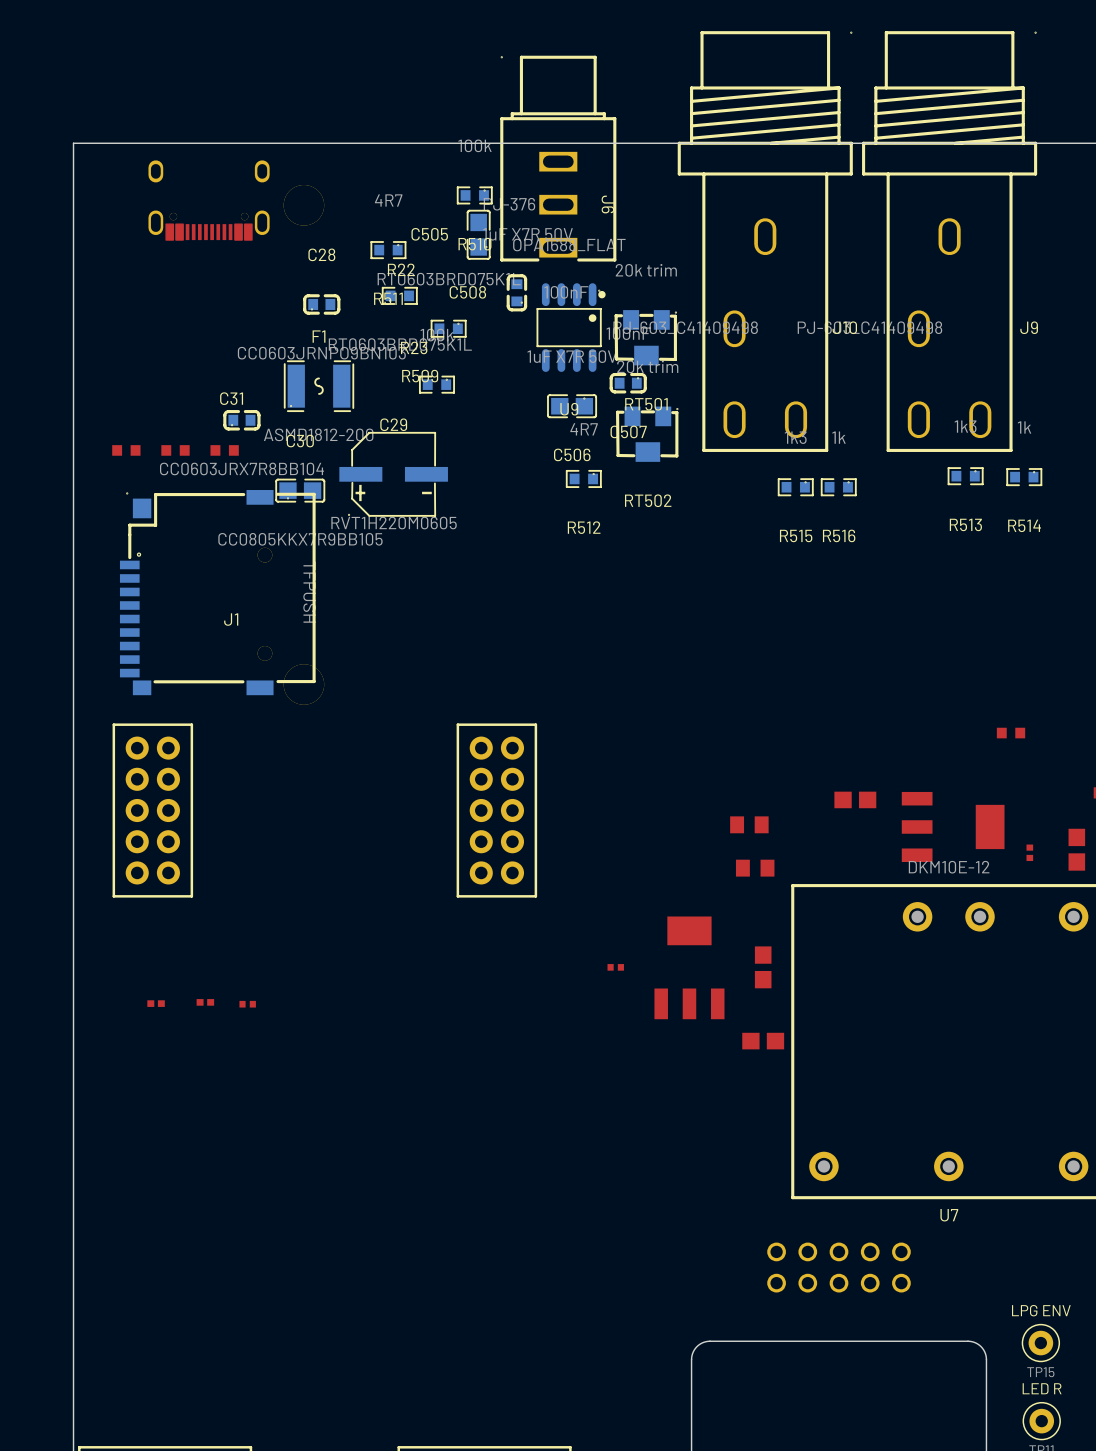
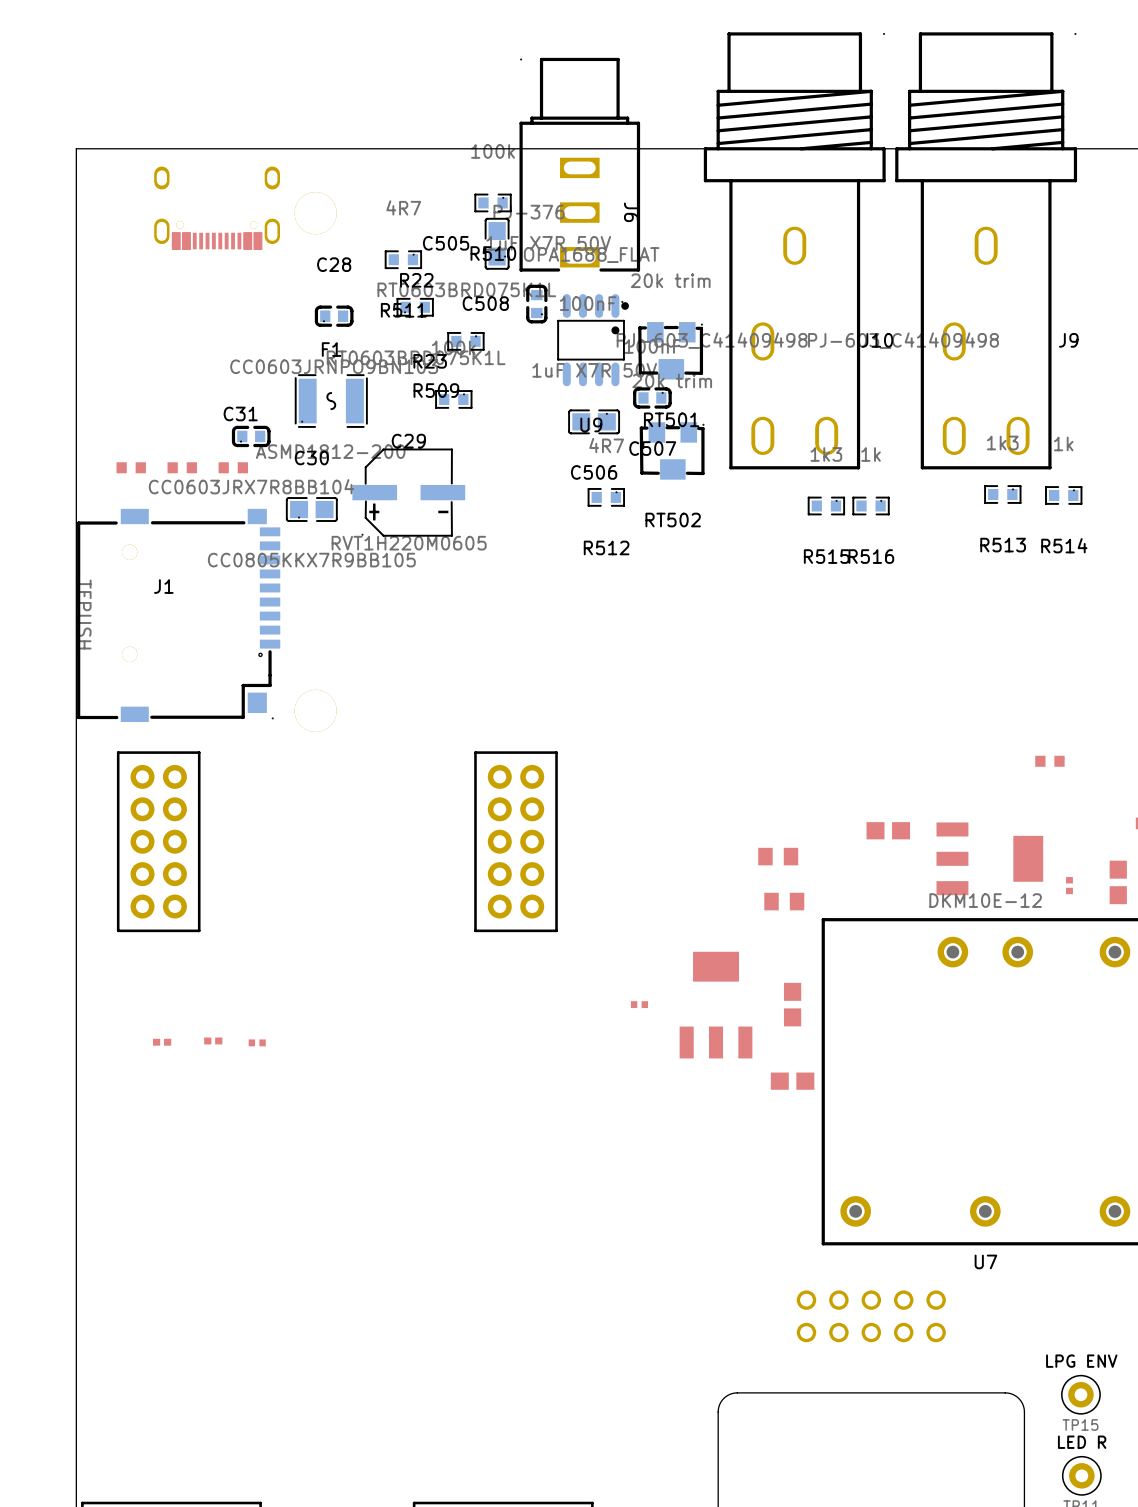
J1 rotation: 0° (217, 592) -> 180° (178, 615)

